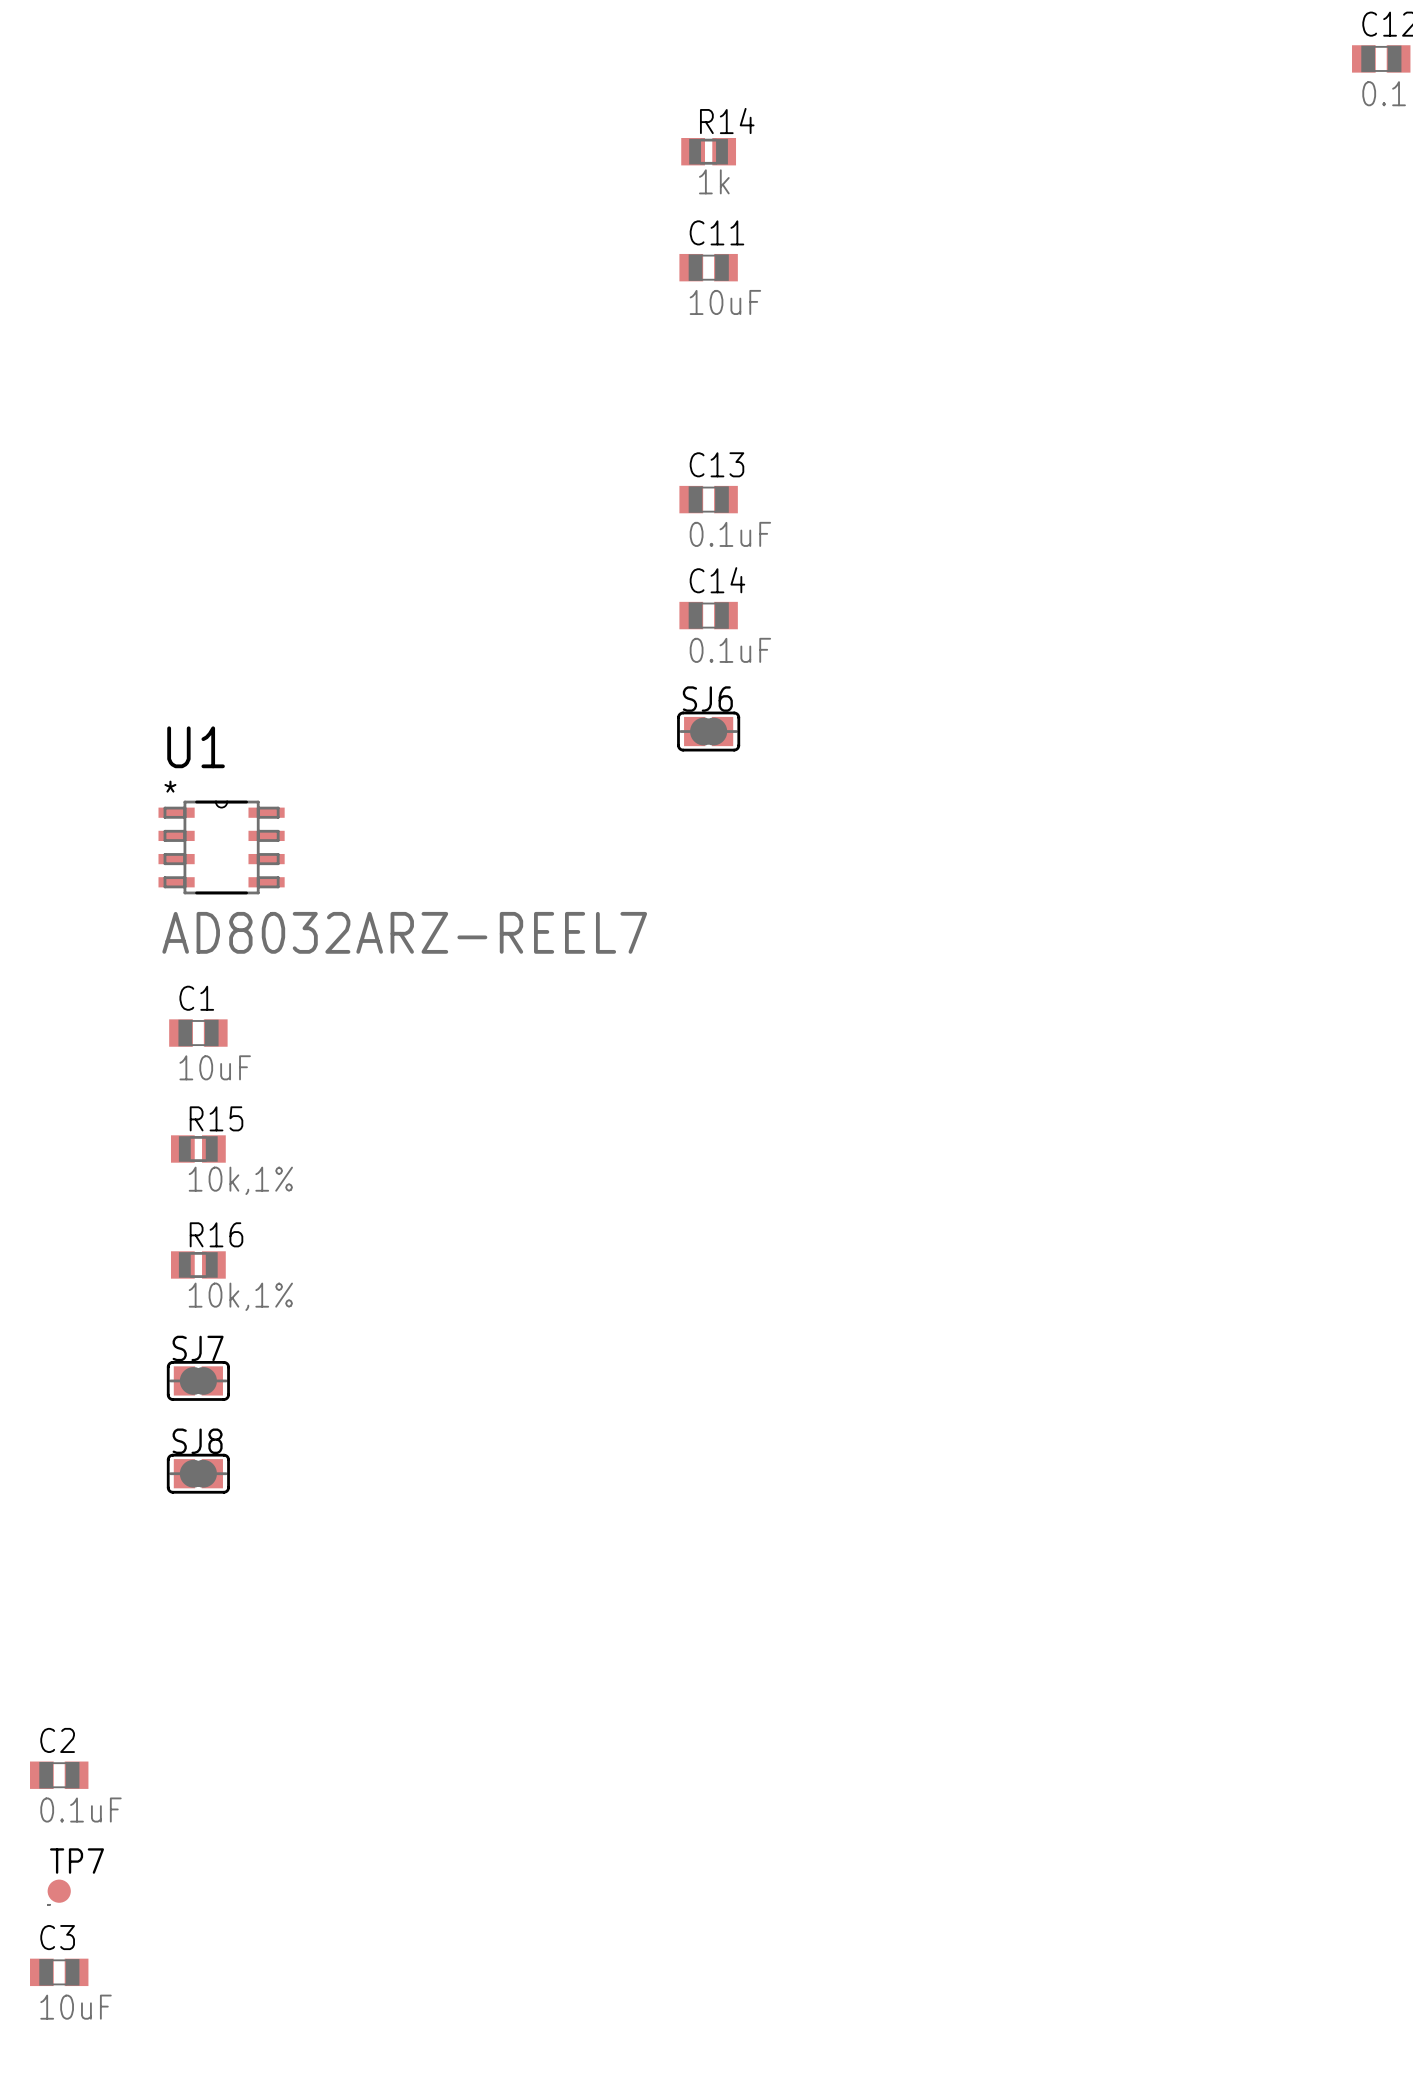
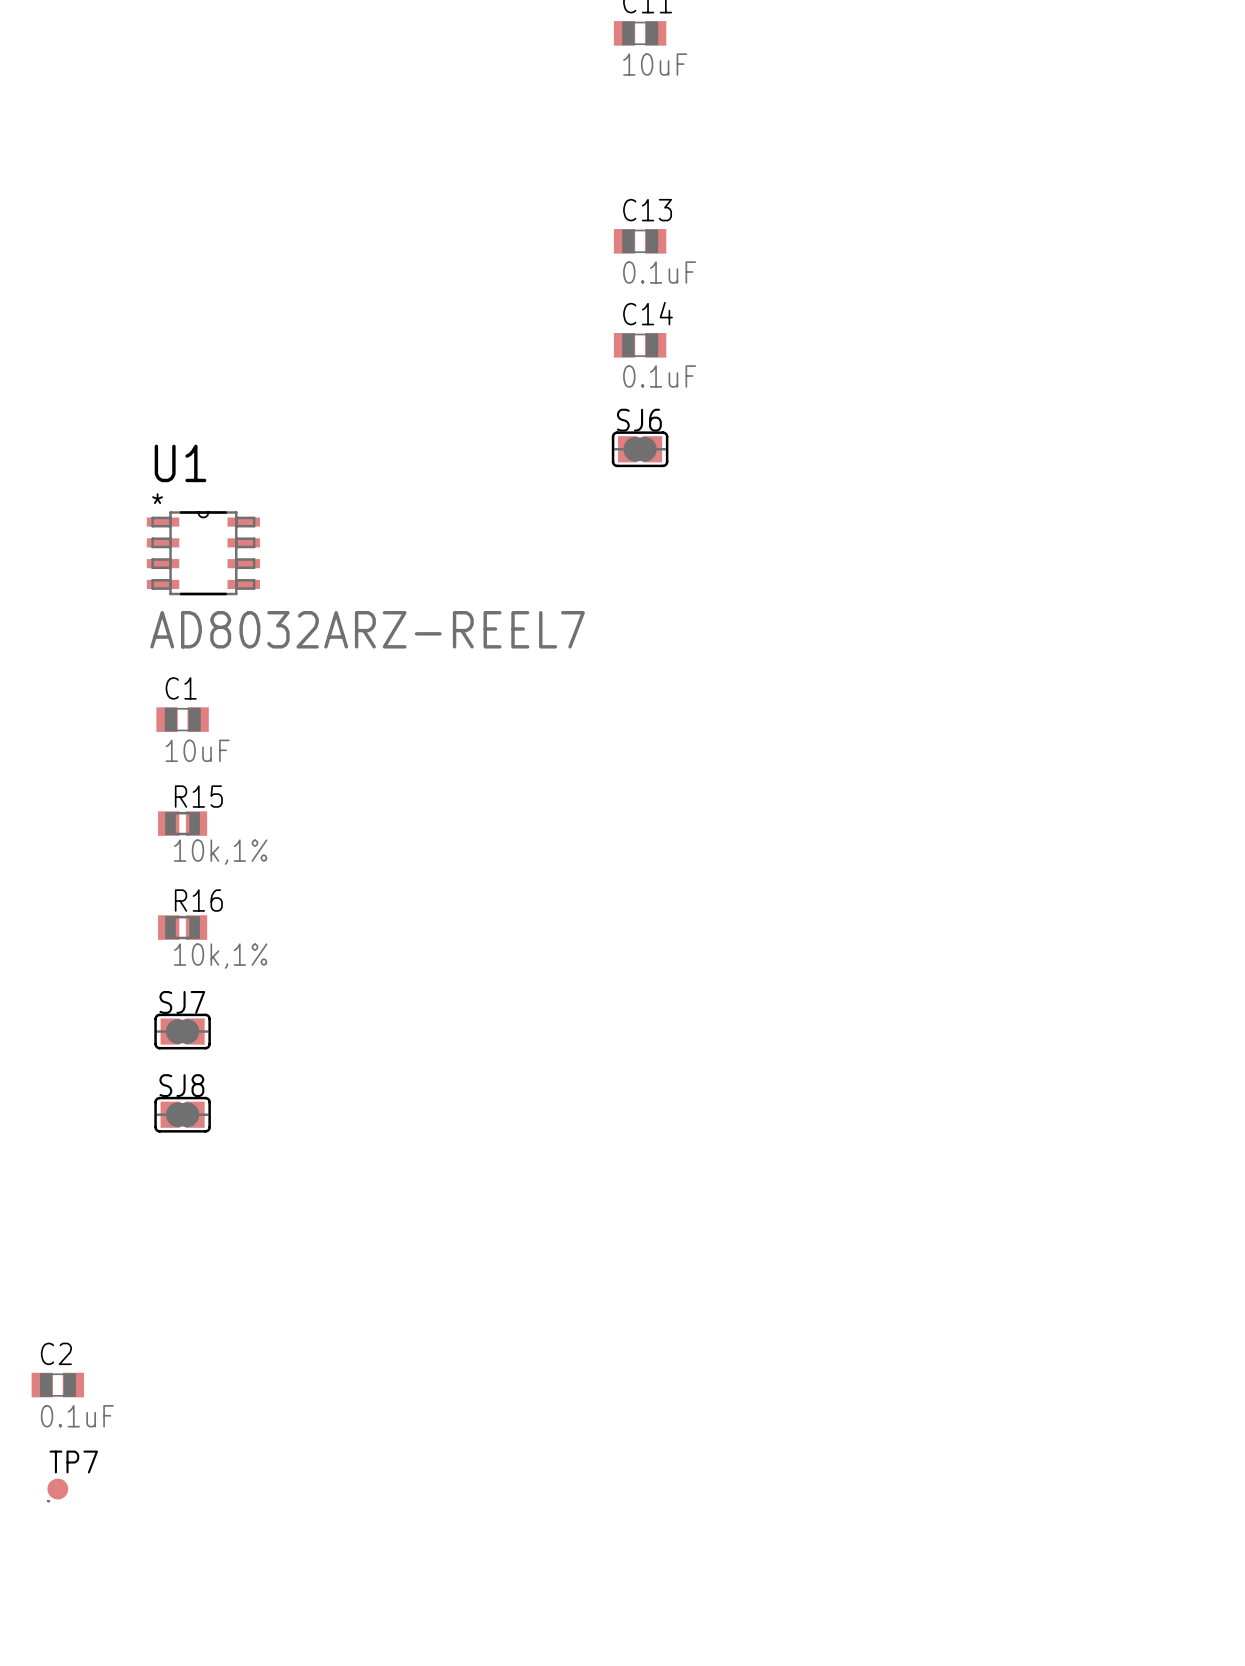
C3: 10uF (59, 1972) -> none

